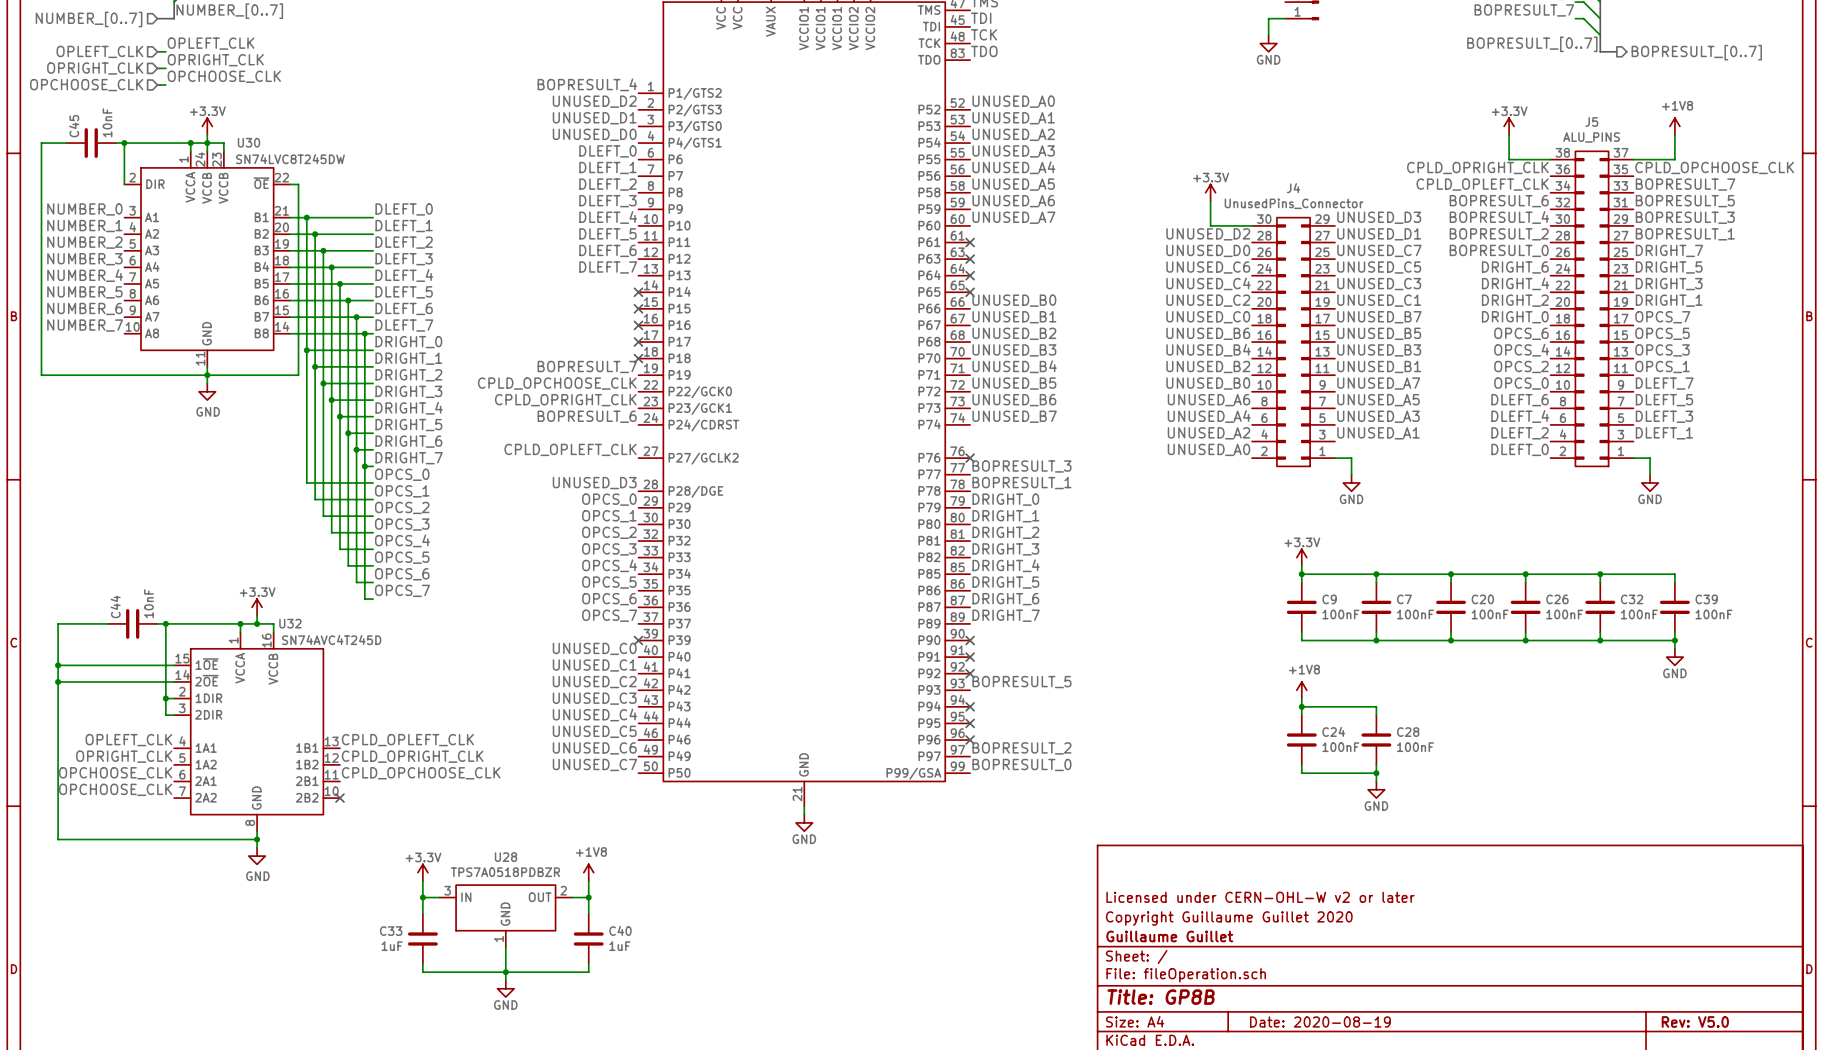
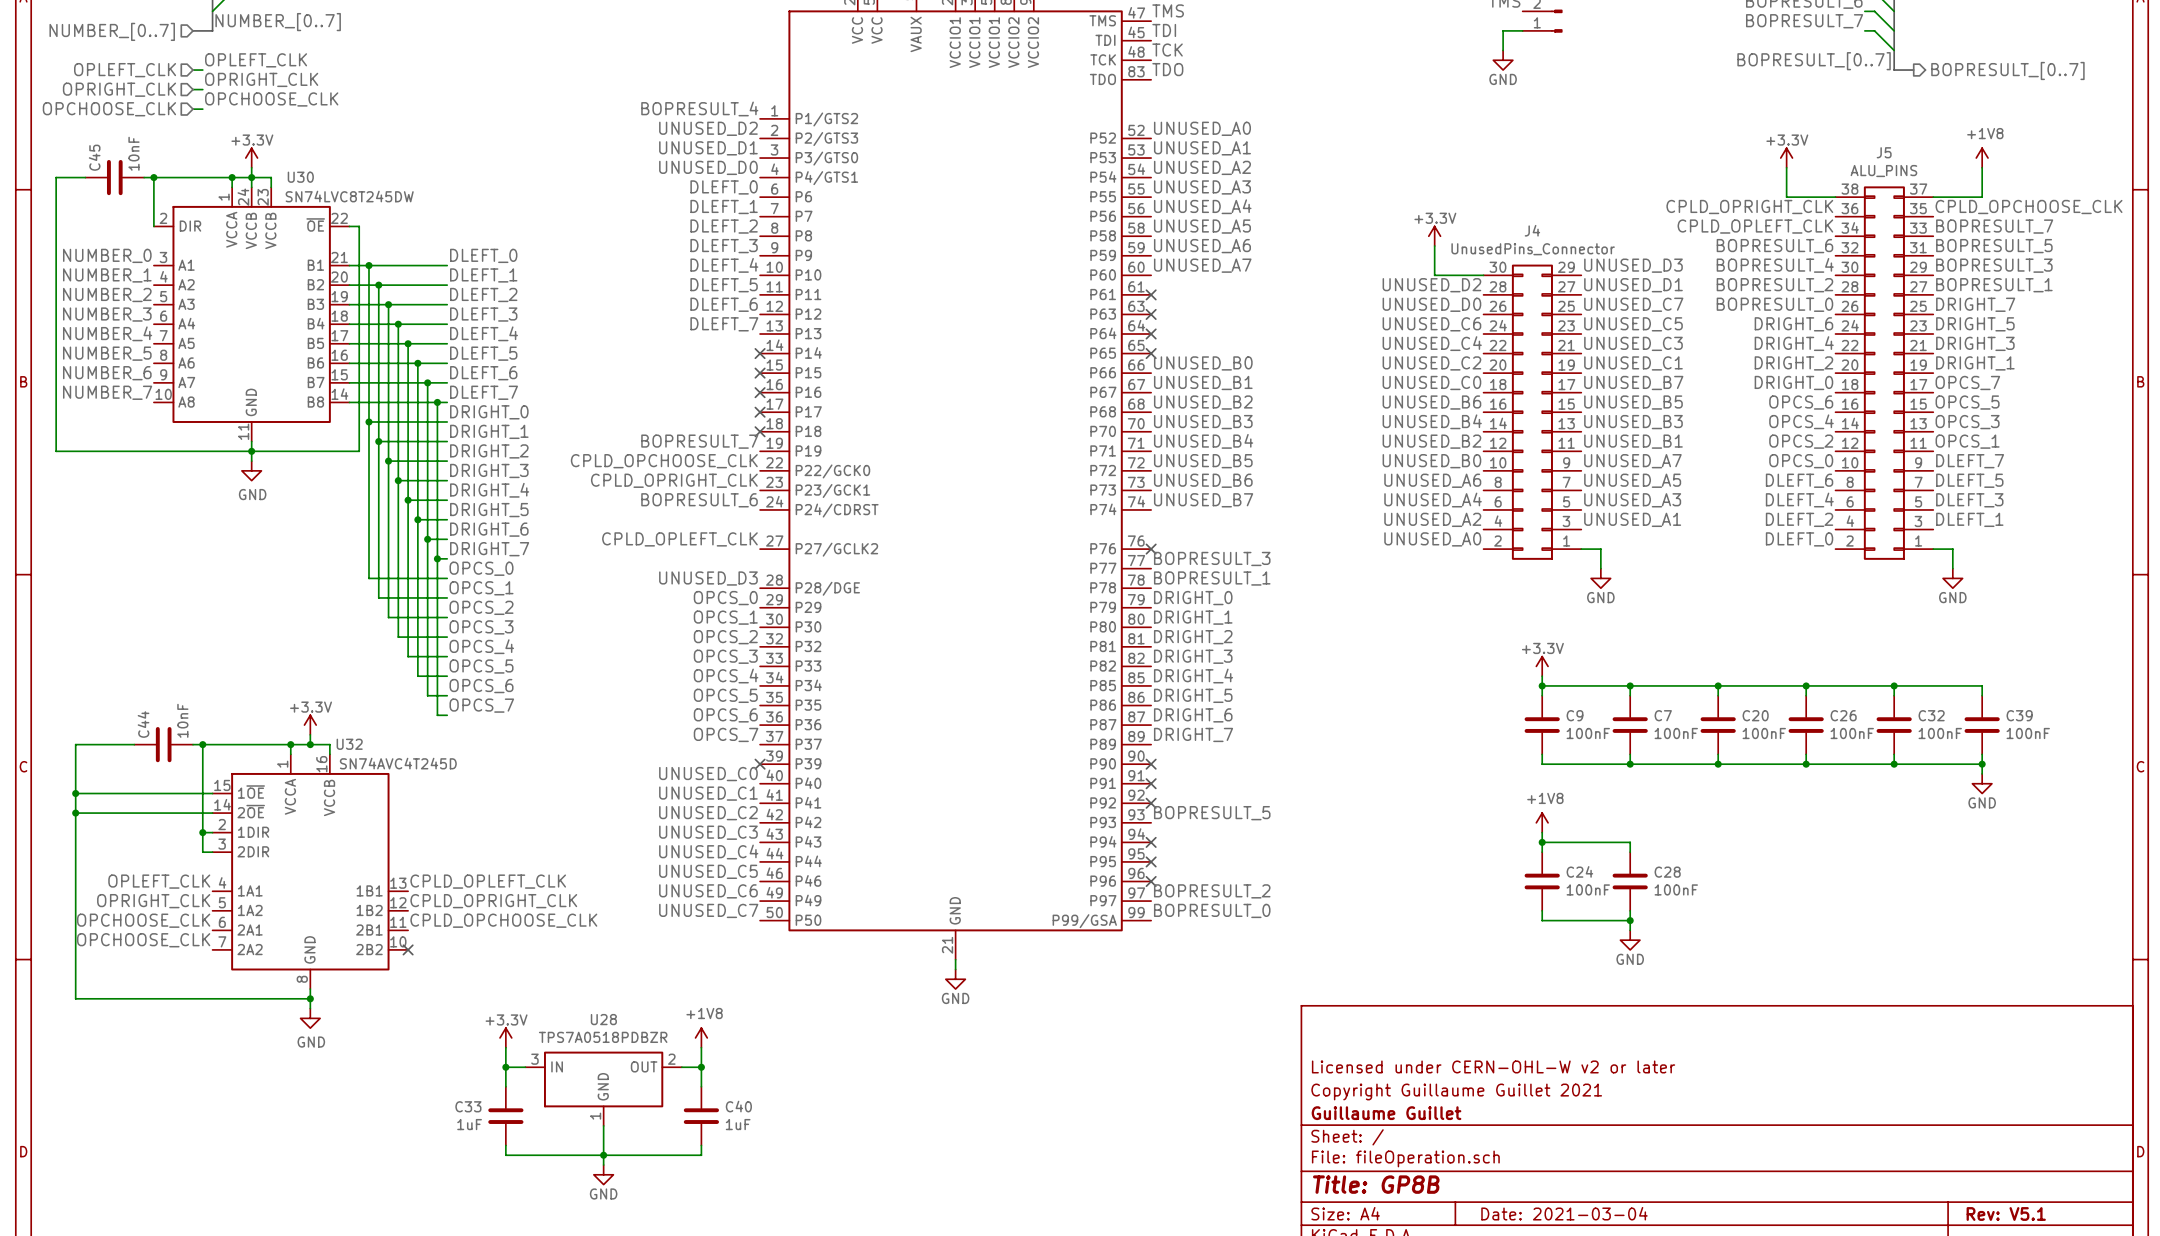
title block: Copyright Guillaume Guillet 2020 (1229, 918) -> Copyright Guillaume Guillet 2021 (1456, 1091)
title block: Date: 2020-08-19 (1320, 1022) -> Date: 2021-03-04 (1564, 1213)
title block: Rev: V5.0 (1695, 1022) -> Rev: V5.1 (2006, 1213)

